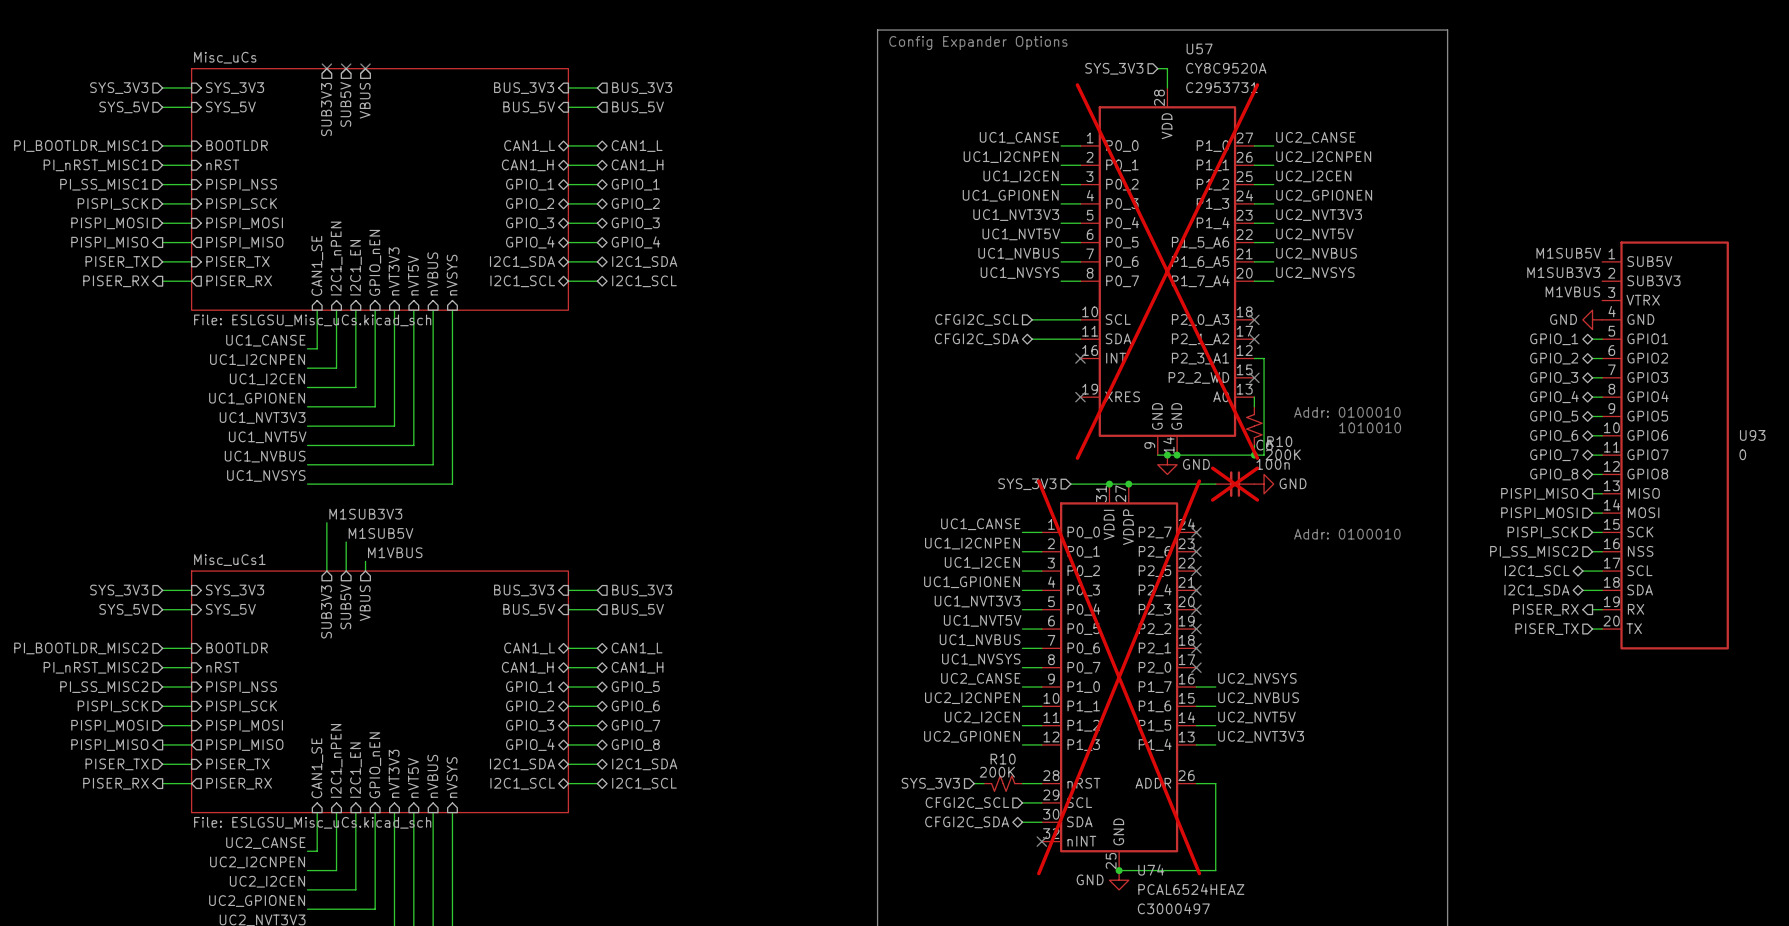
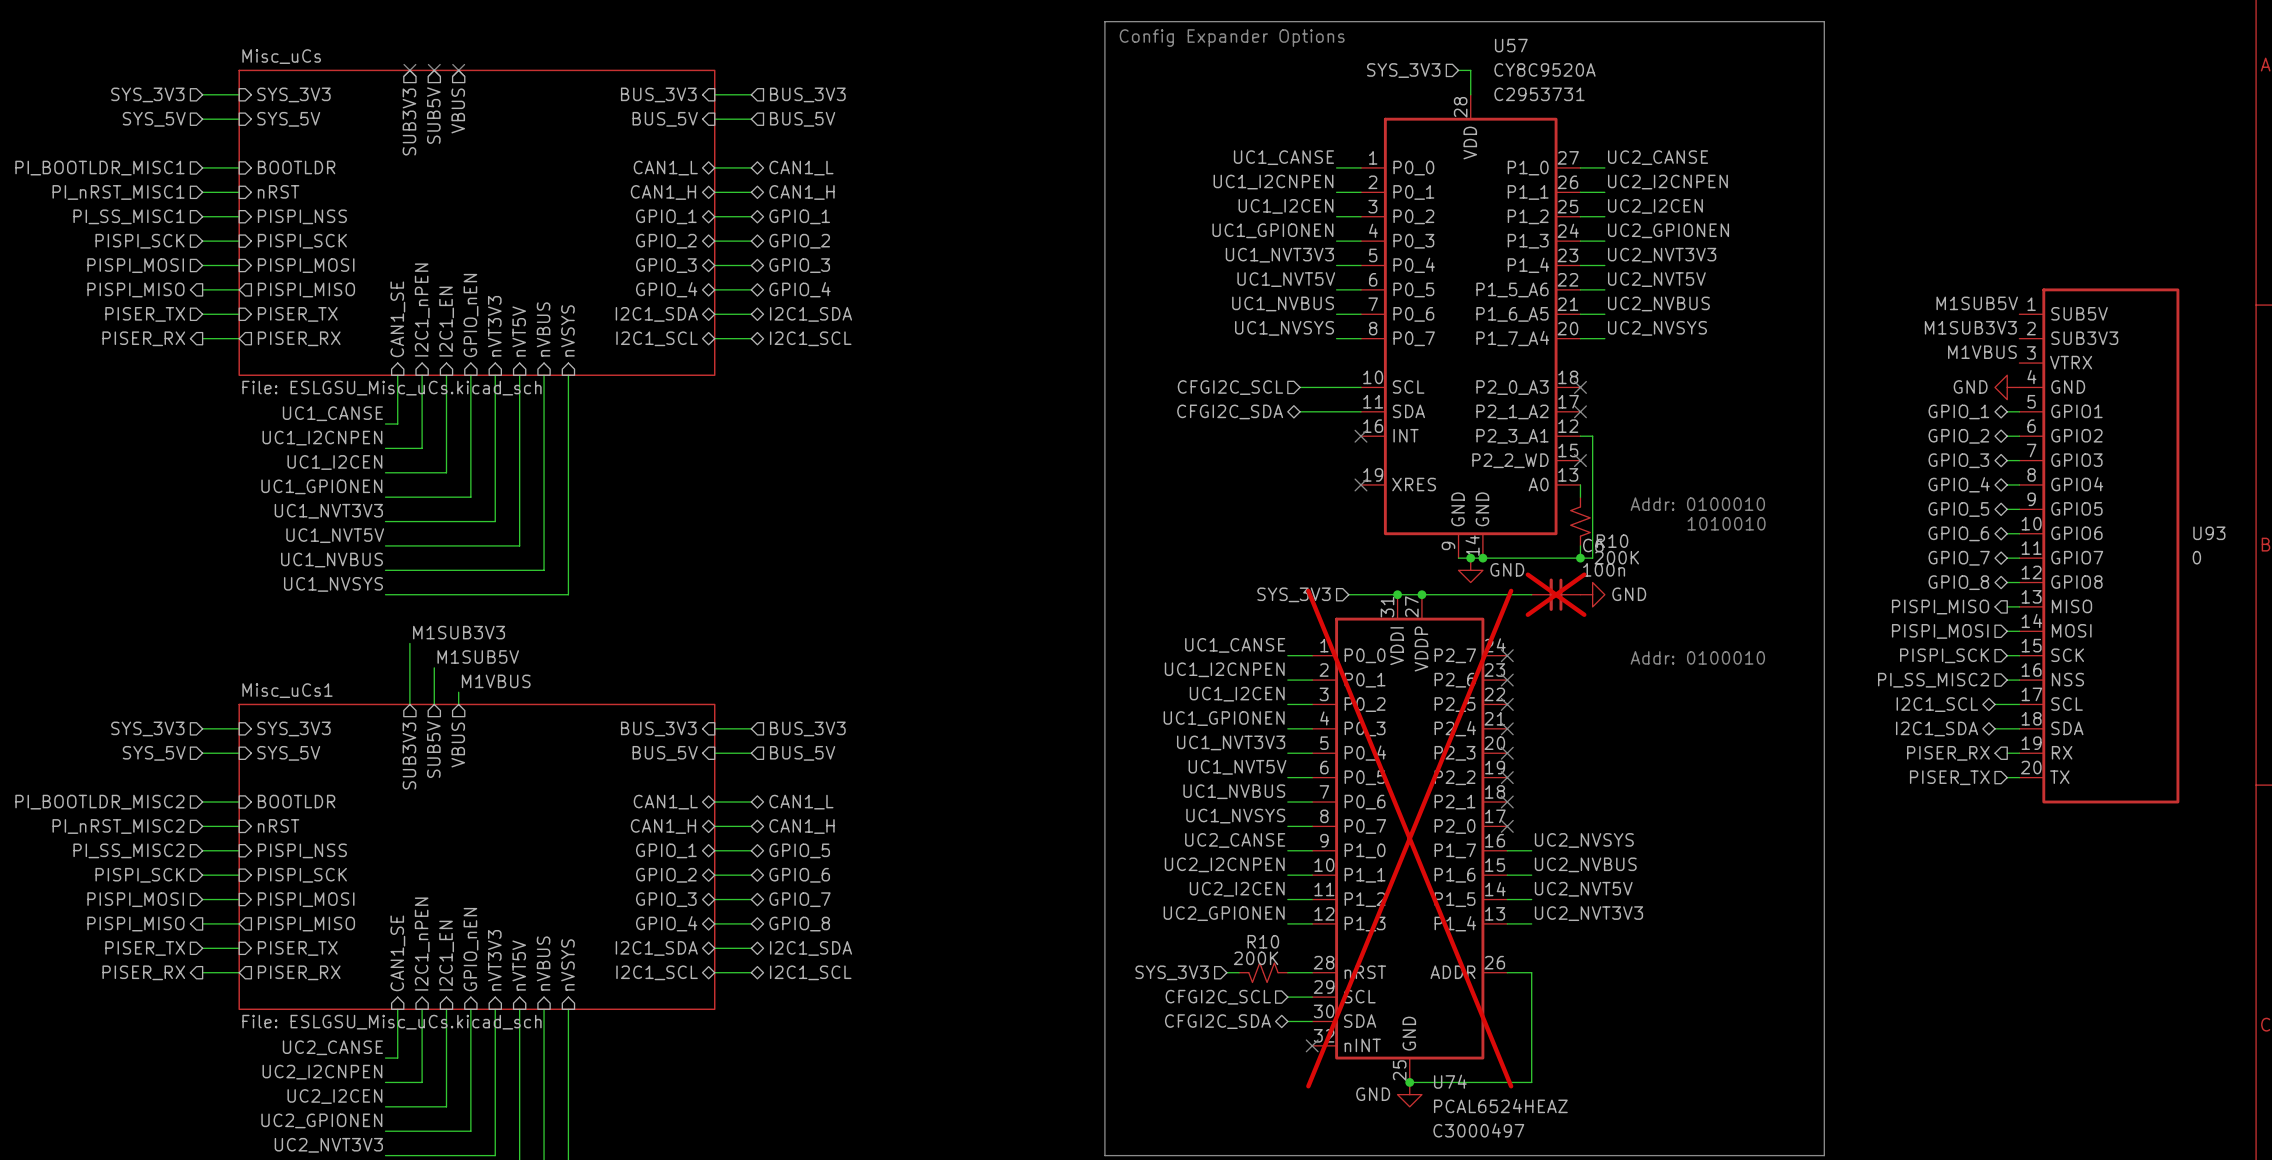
U57 do-not-place cross: (1167, 271) -> none

